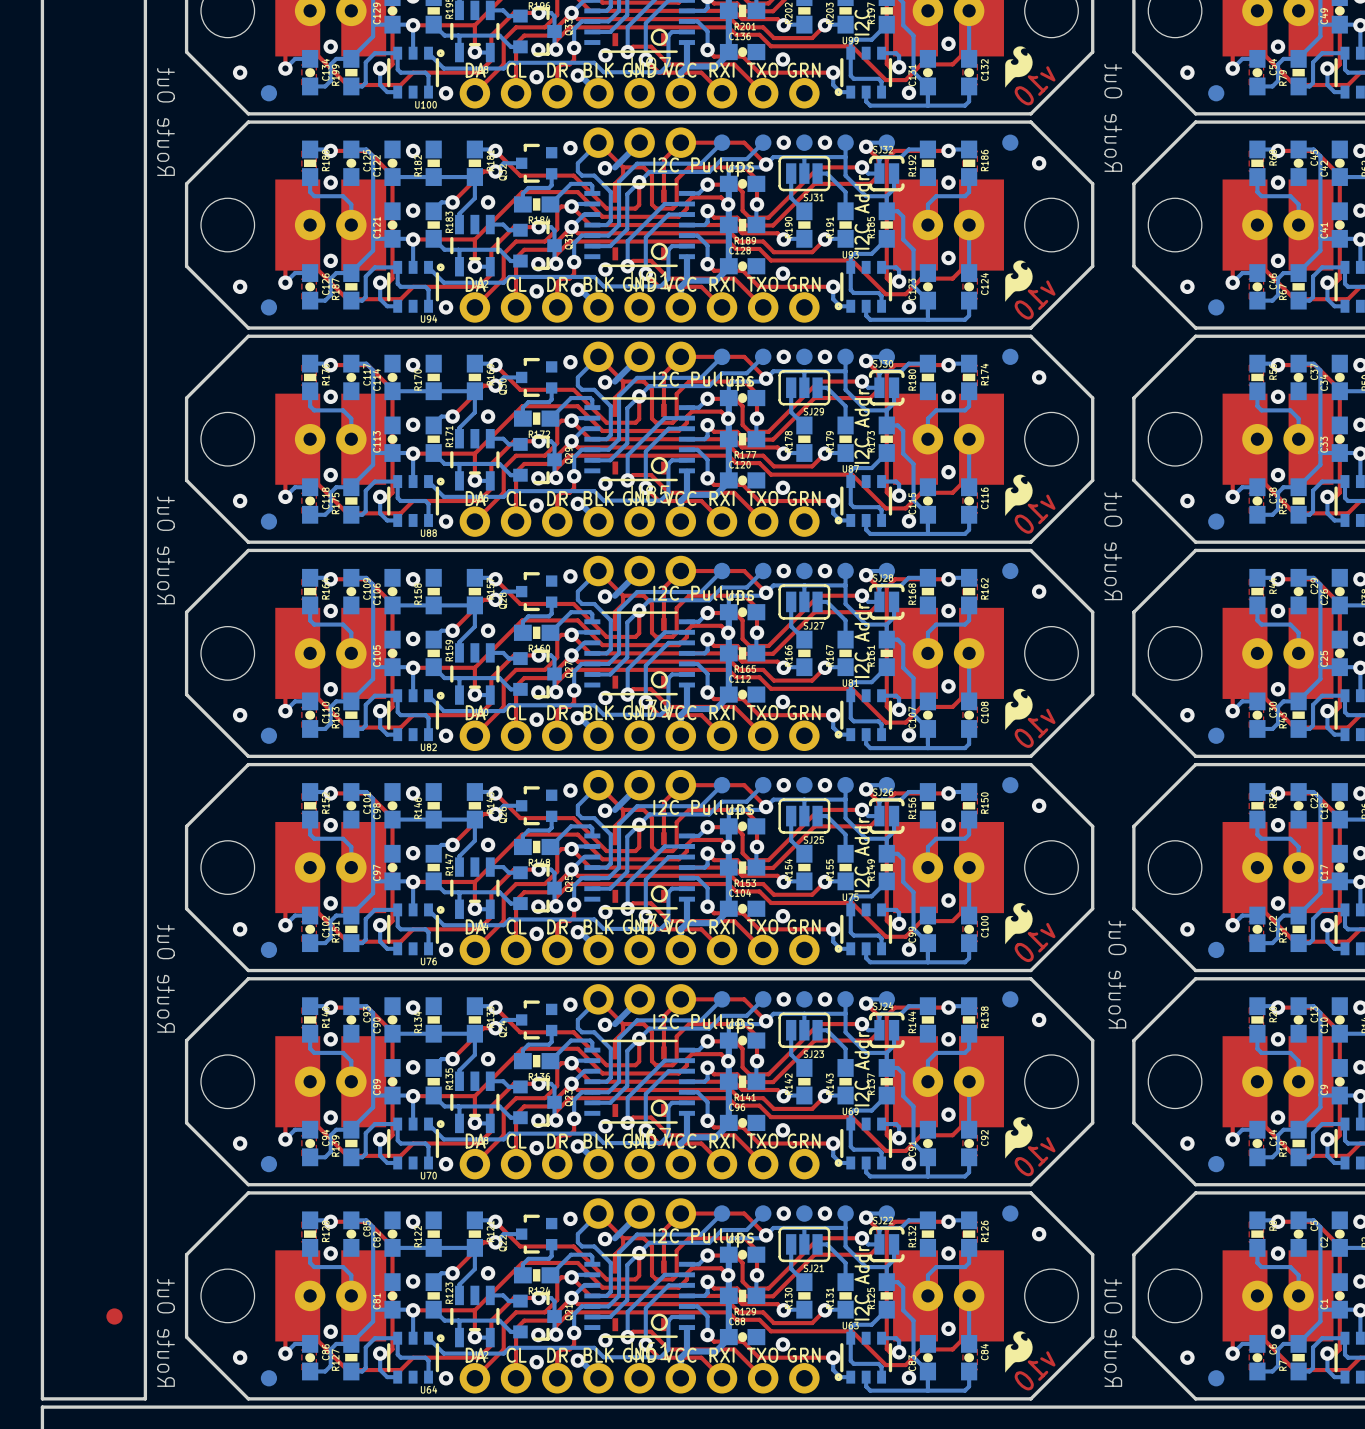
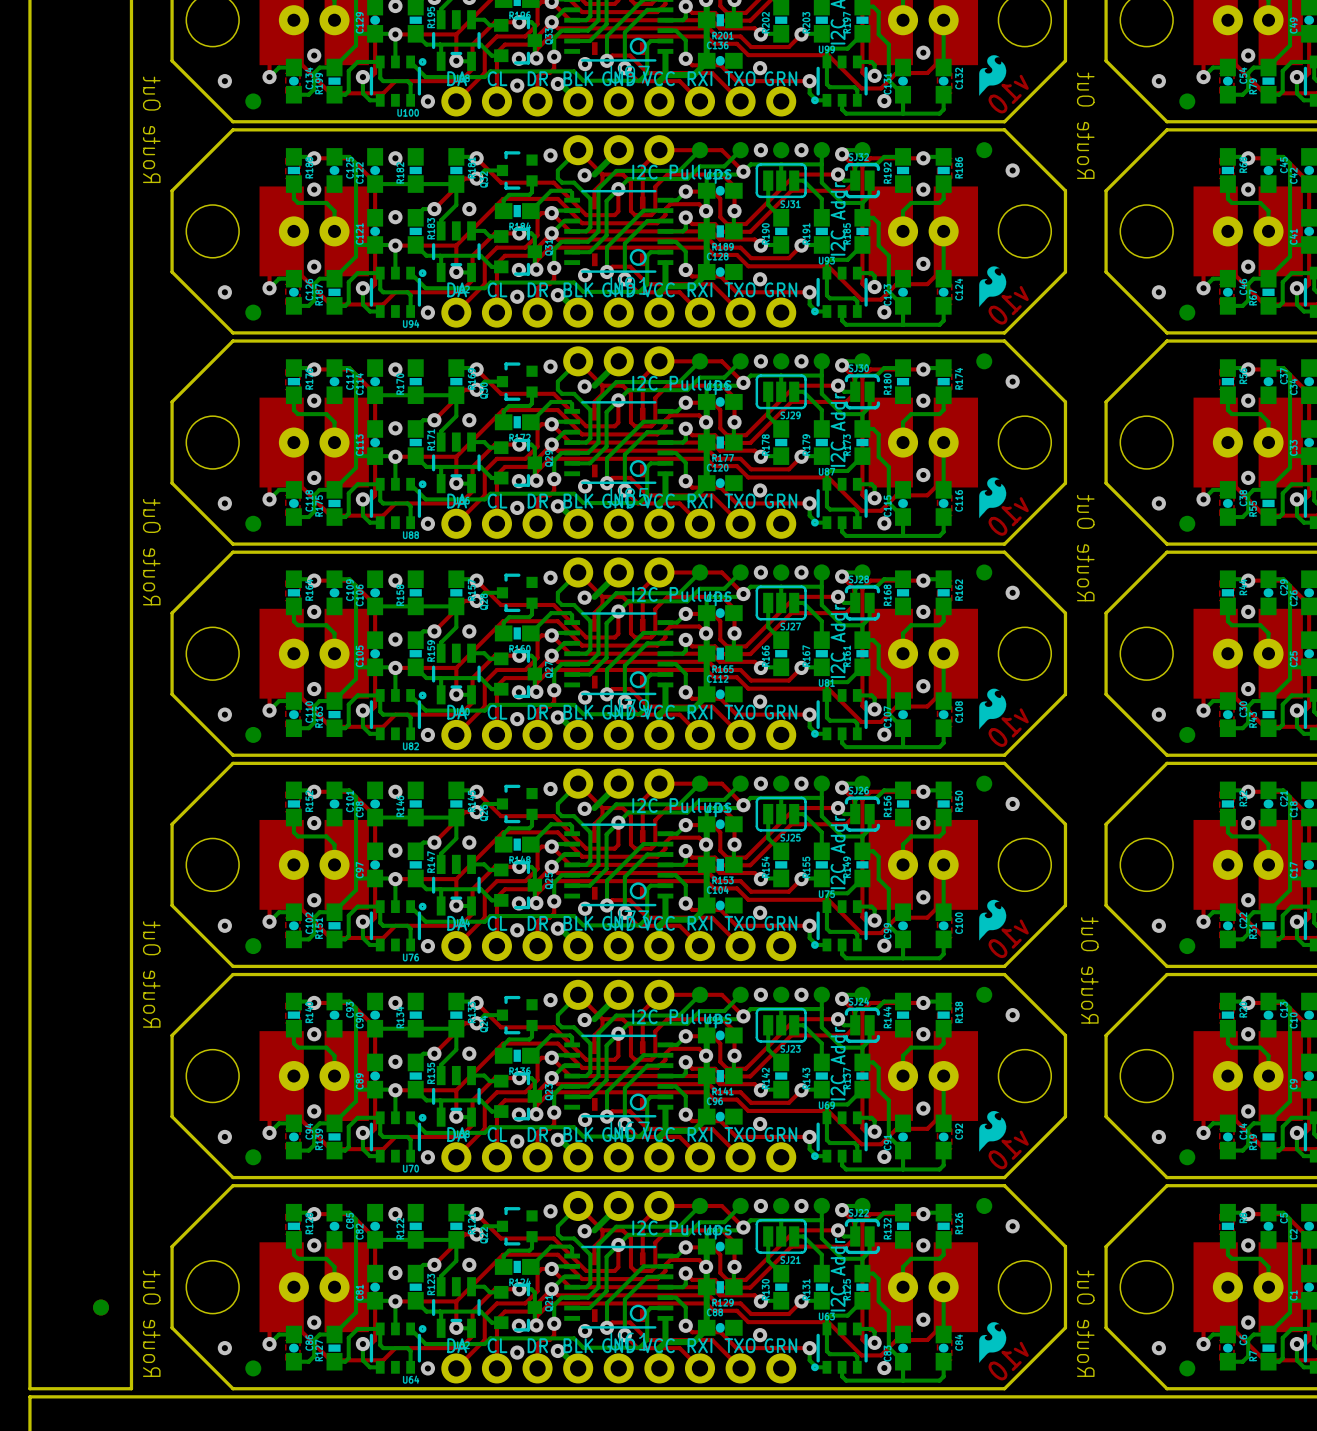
part: none -> (101, 1307)

